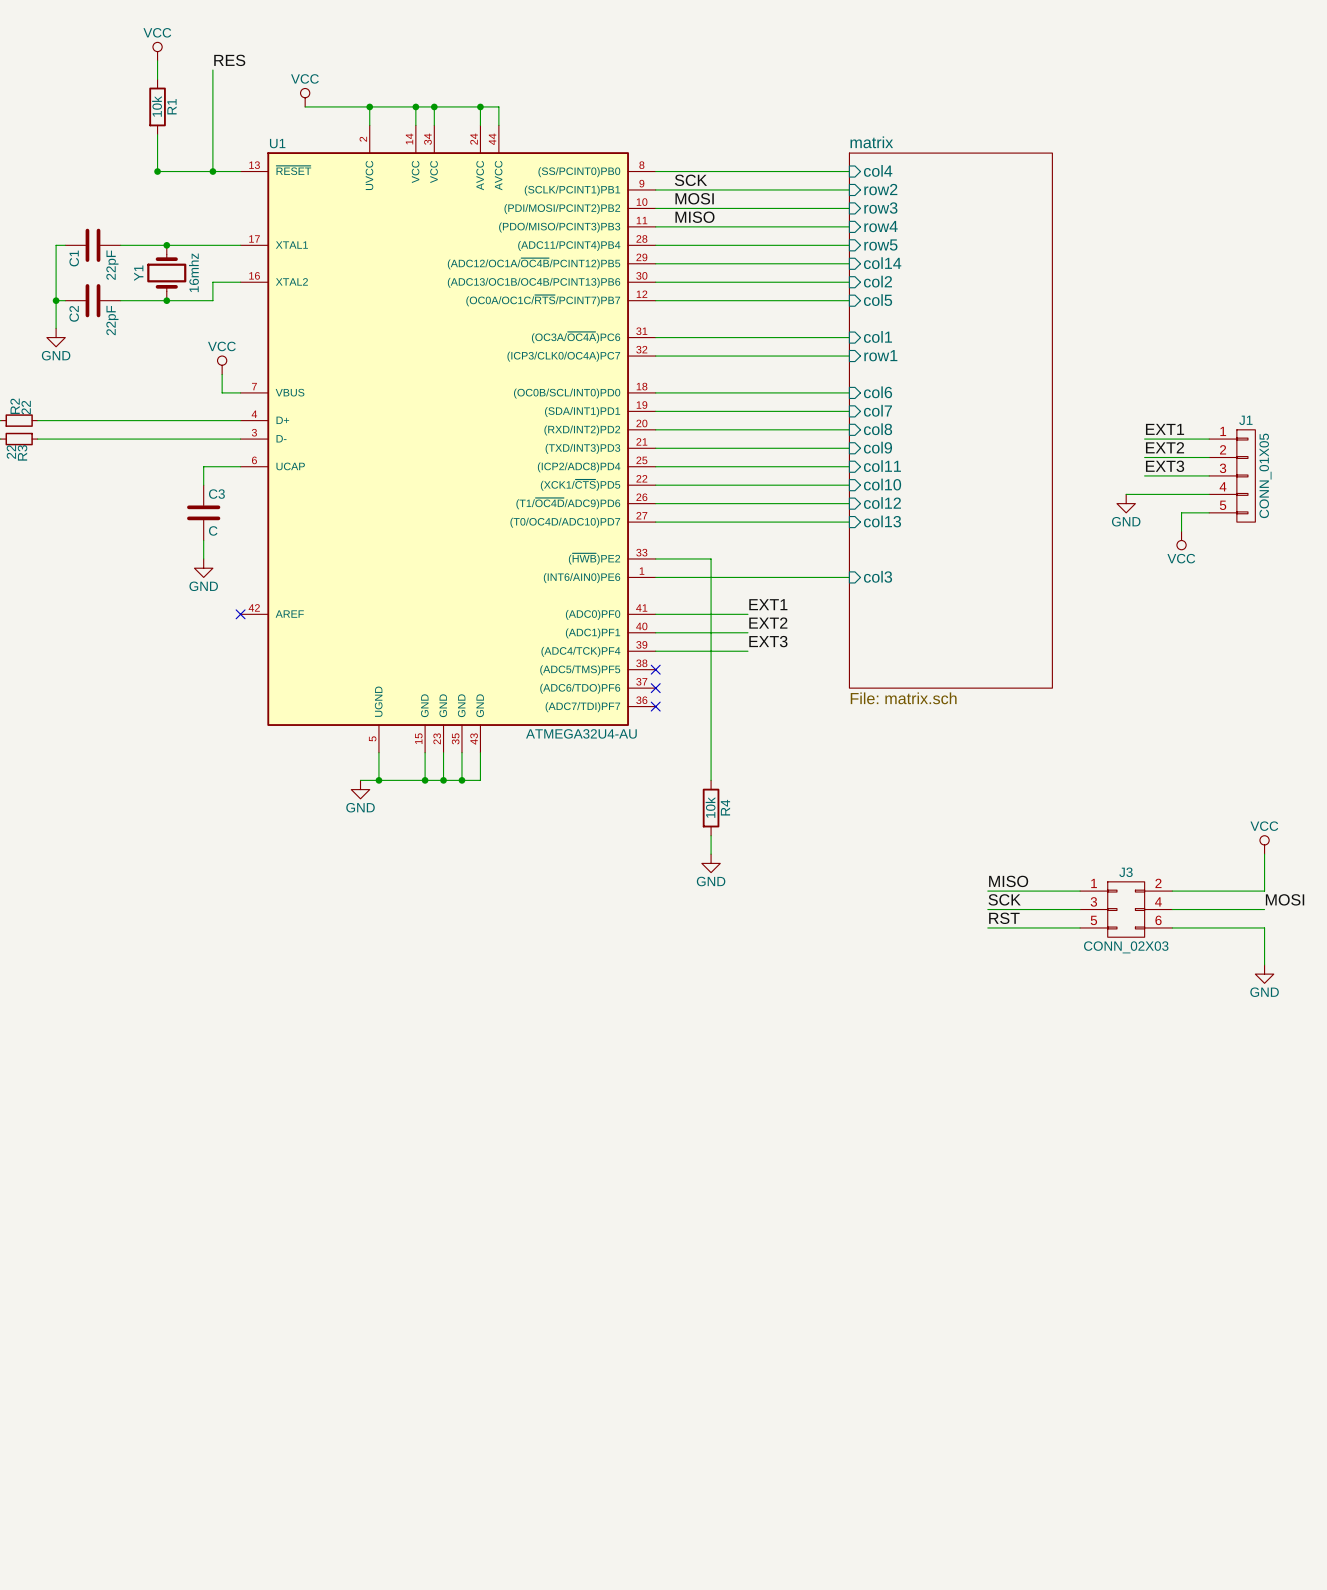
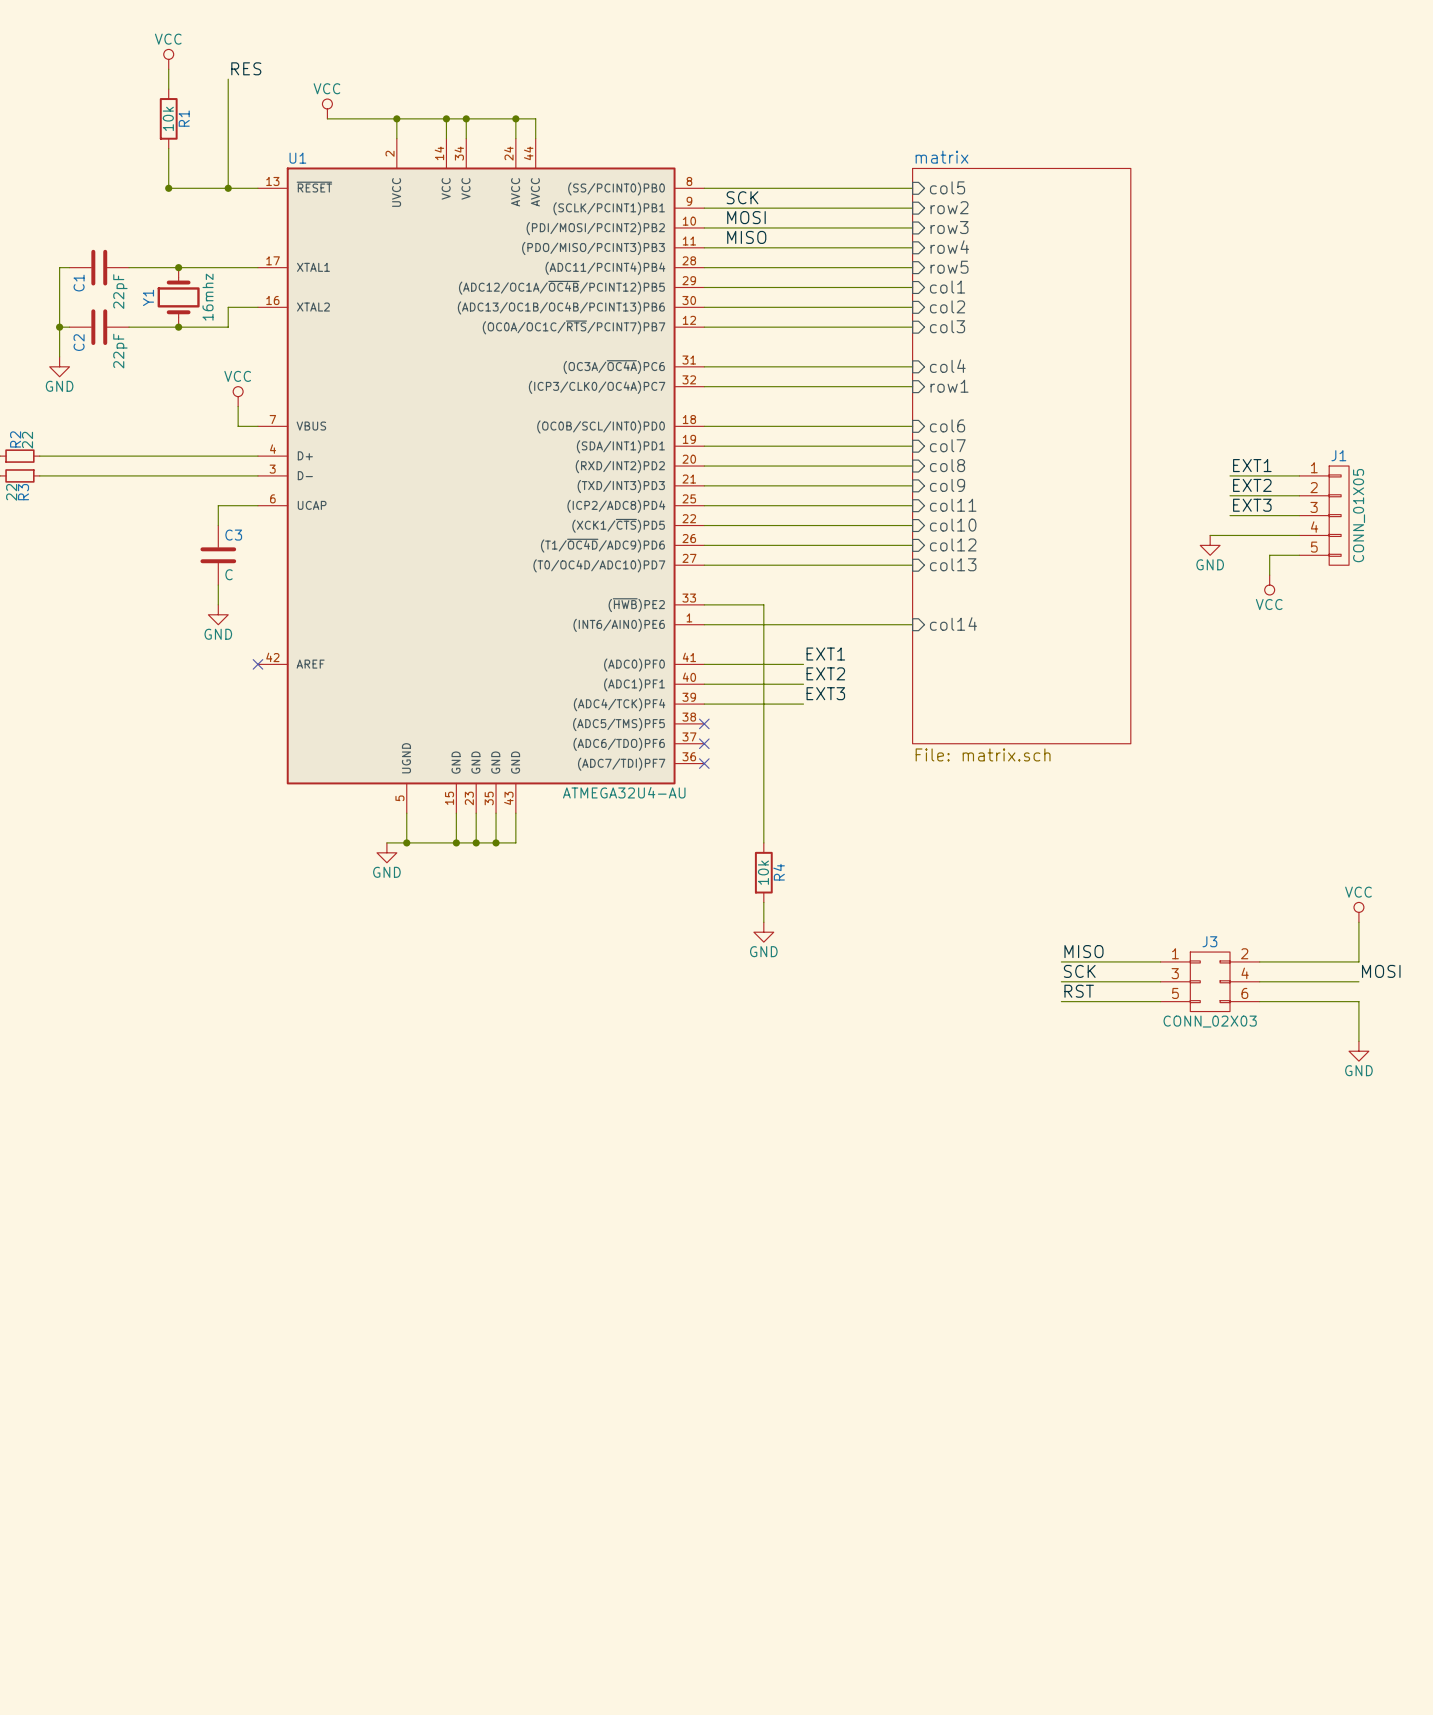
sheet pin: col4 (878, 170) -> col5 (947, 187)
sheet pin: col14 (882, 263) -> col1 (947, 287)
sheet pin: col5 (878, 300) -> col3 (947, 326)
sheet pin: col1 (877, 336) -> col4 (947, 366)
sheet pin: col3 (878, 576) -> col14 (953, 623)

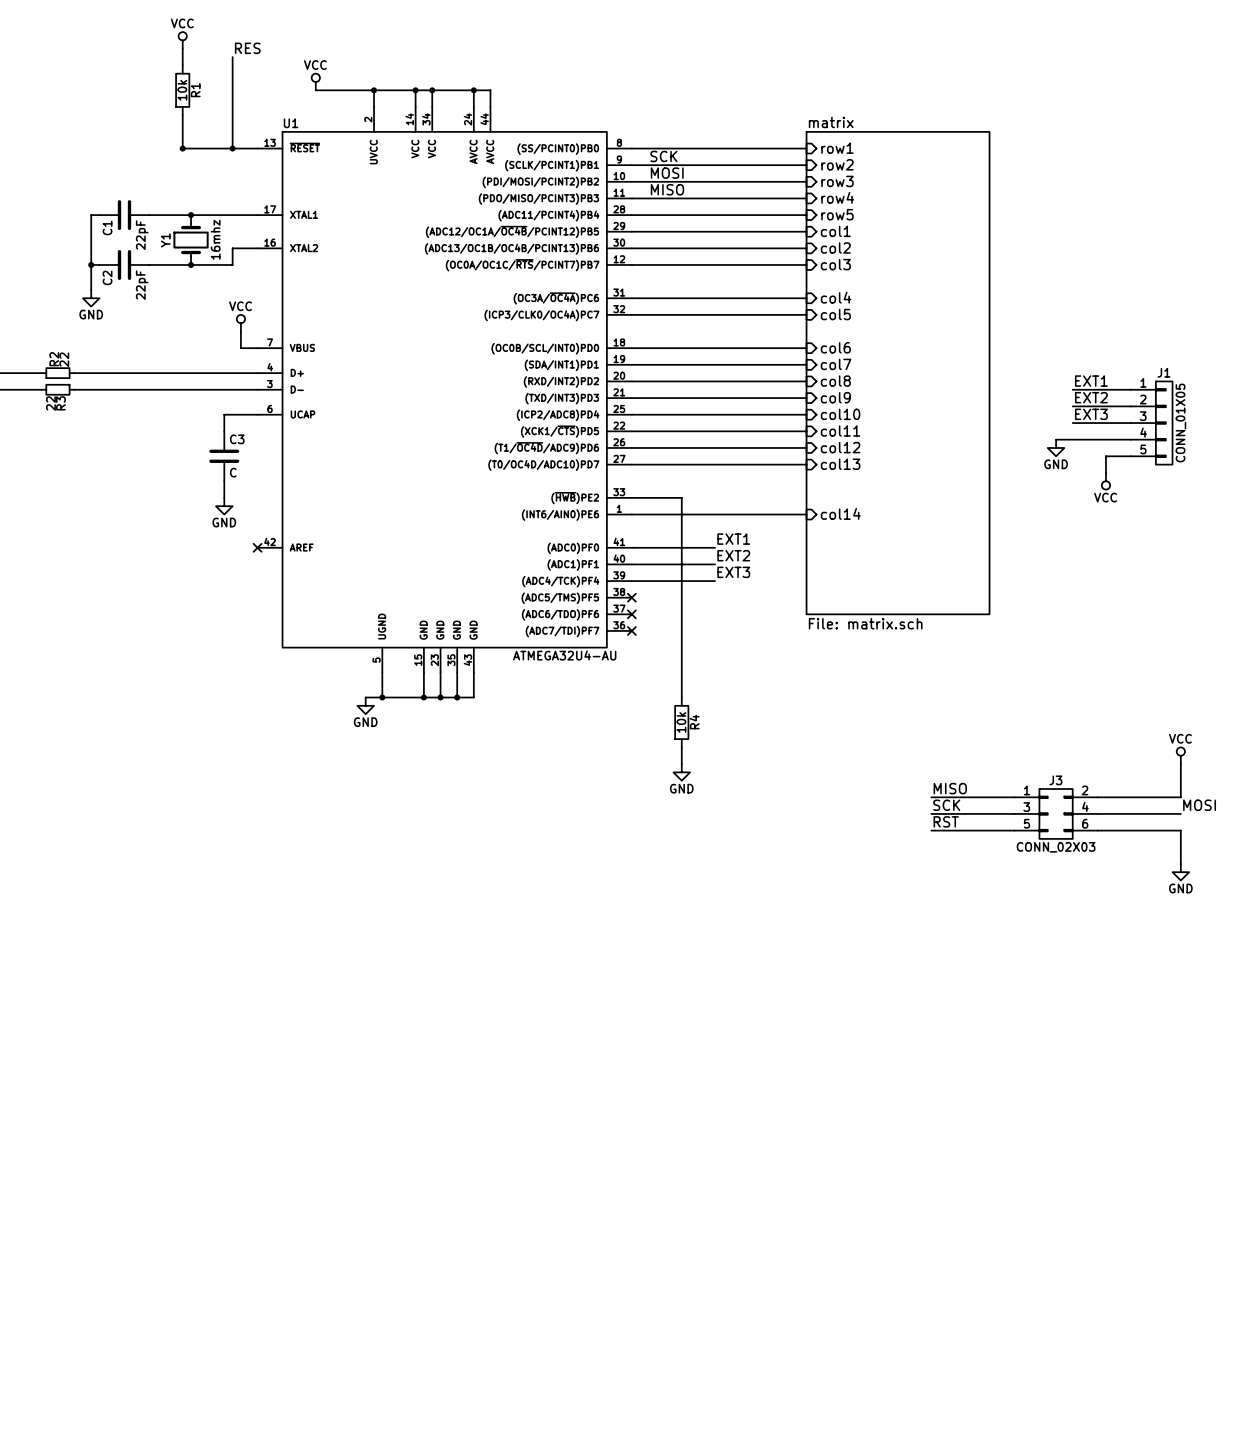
sheet pin: col5 (947, 187) -> row1 (837, 148)
sheet pin: row1 (949, 386) -> col5 (835, 314)
sheet pin: col11 (953, 505) -> col10 (840, 414)
sheet pin: col10 (953, 525) -> col11 (840, 430)

